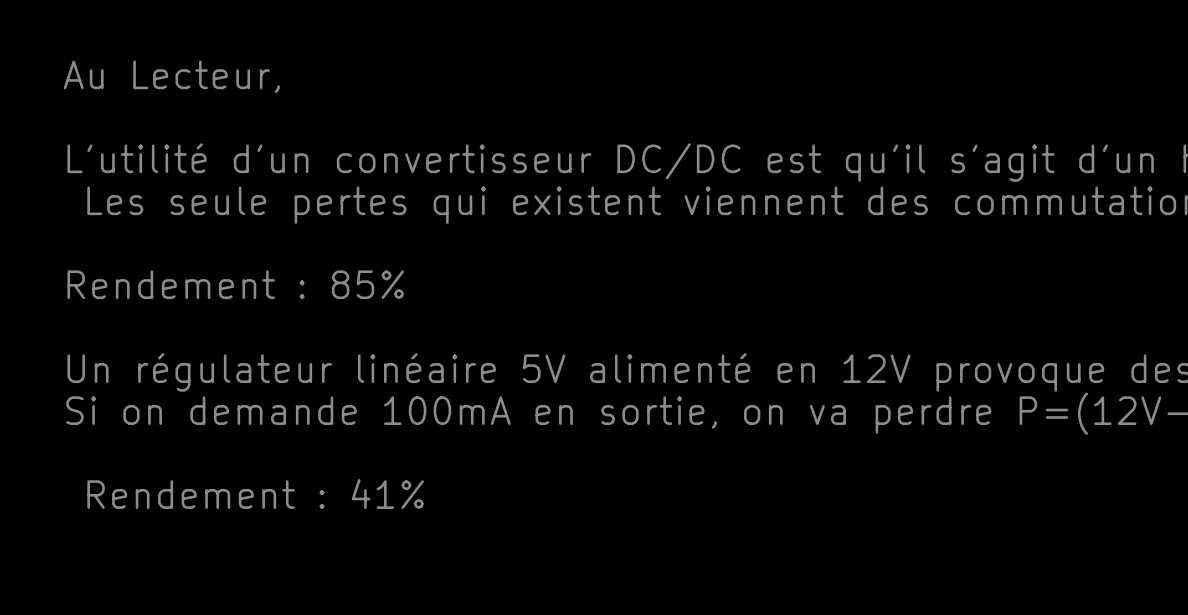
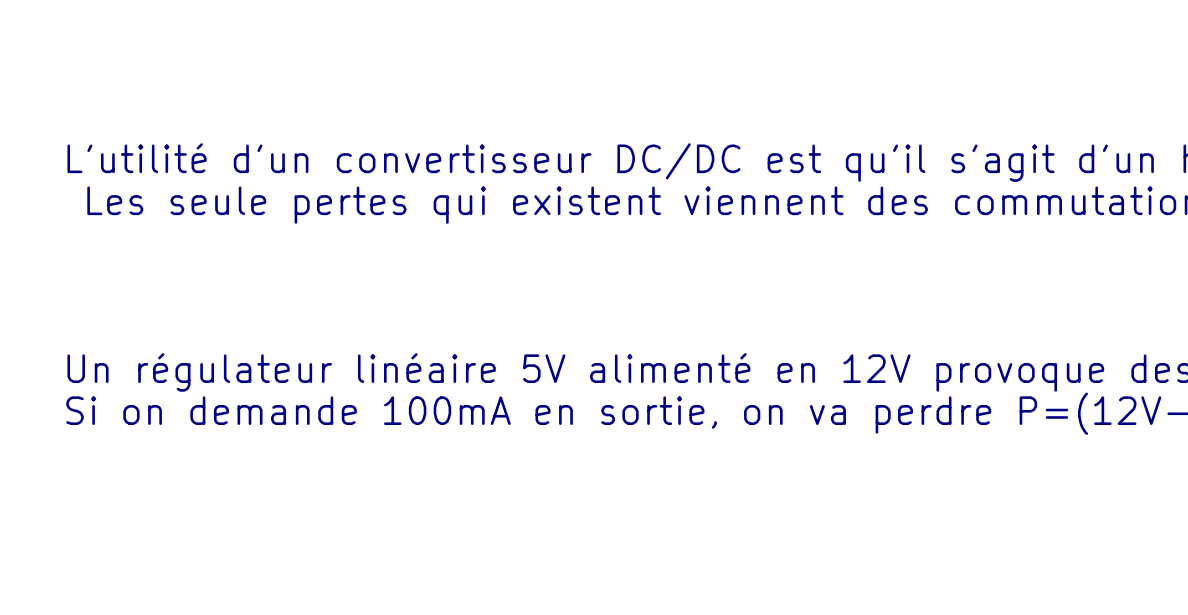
text: Au Lecteur, (171, 76) -> none
text: Rendement : 85% (235, 284) -> none
text: Rendement : 41% (255, 493) -> none

